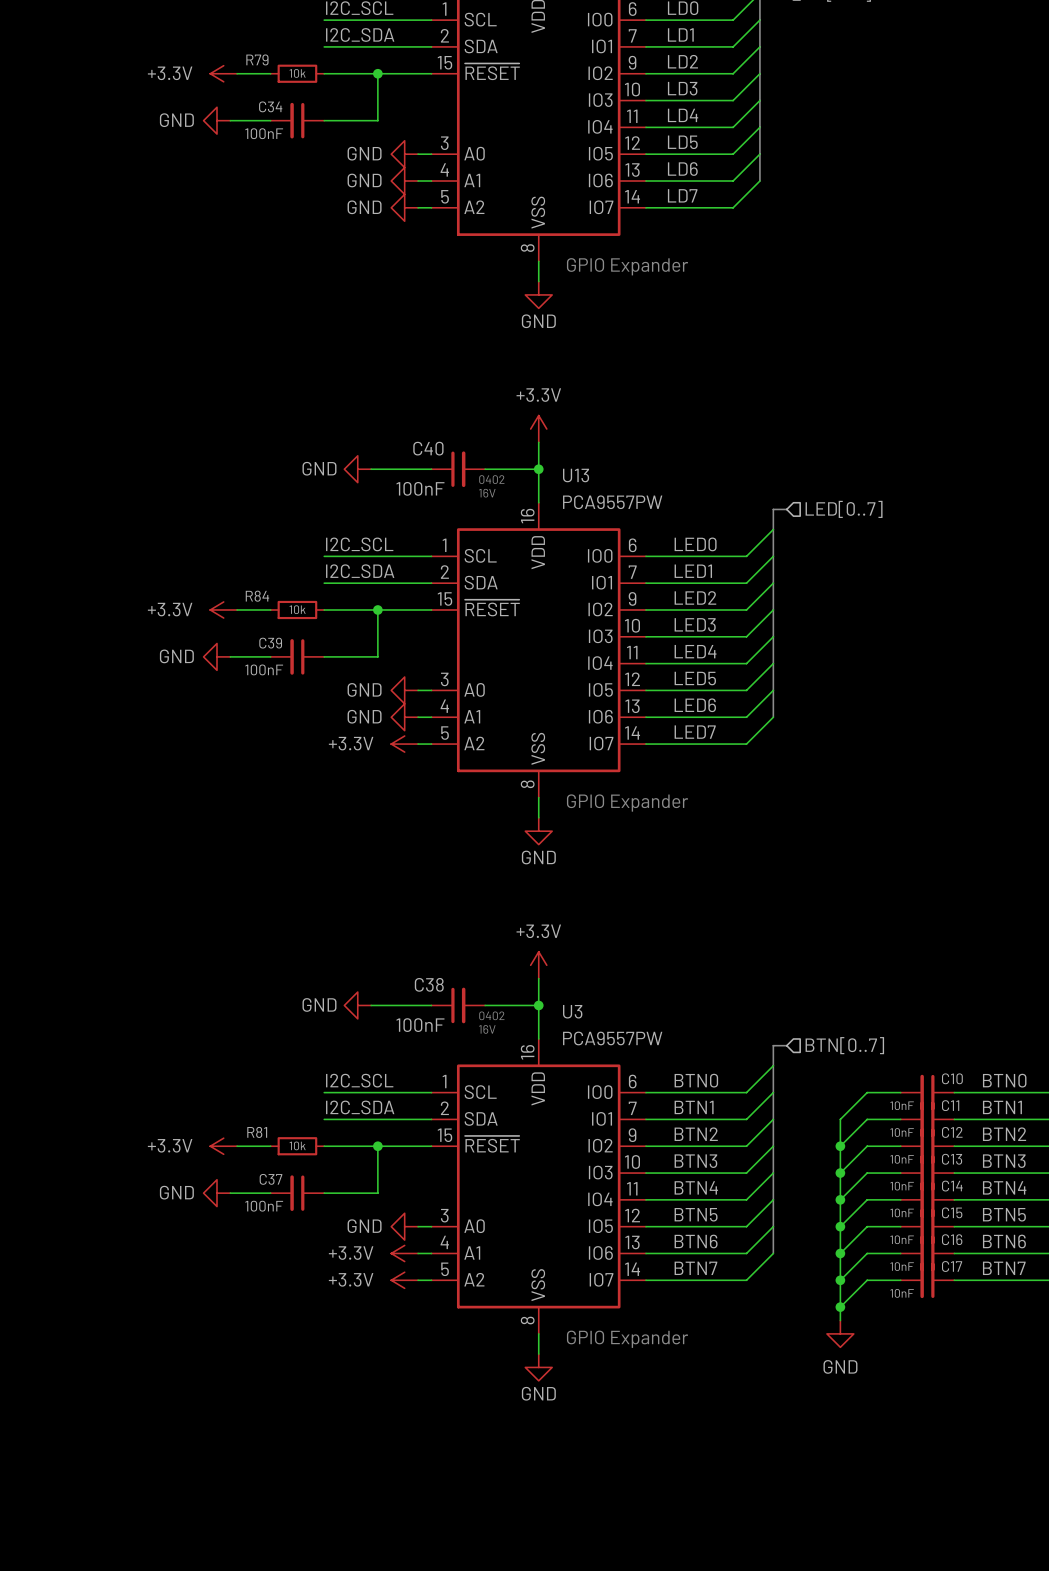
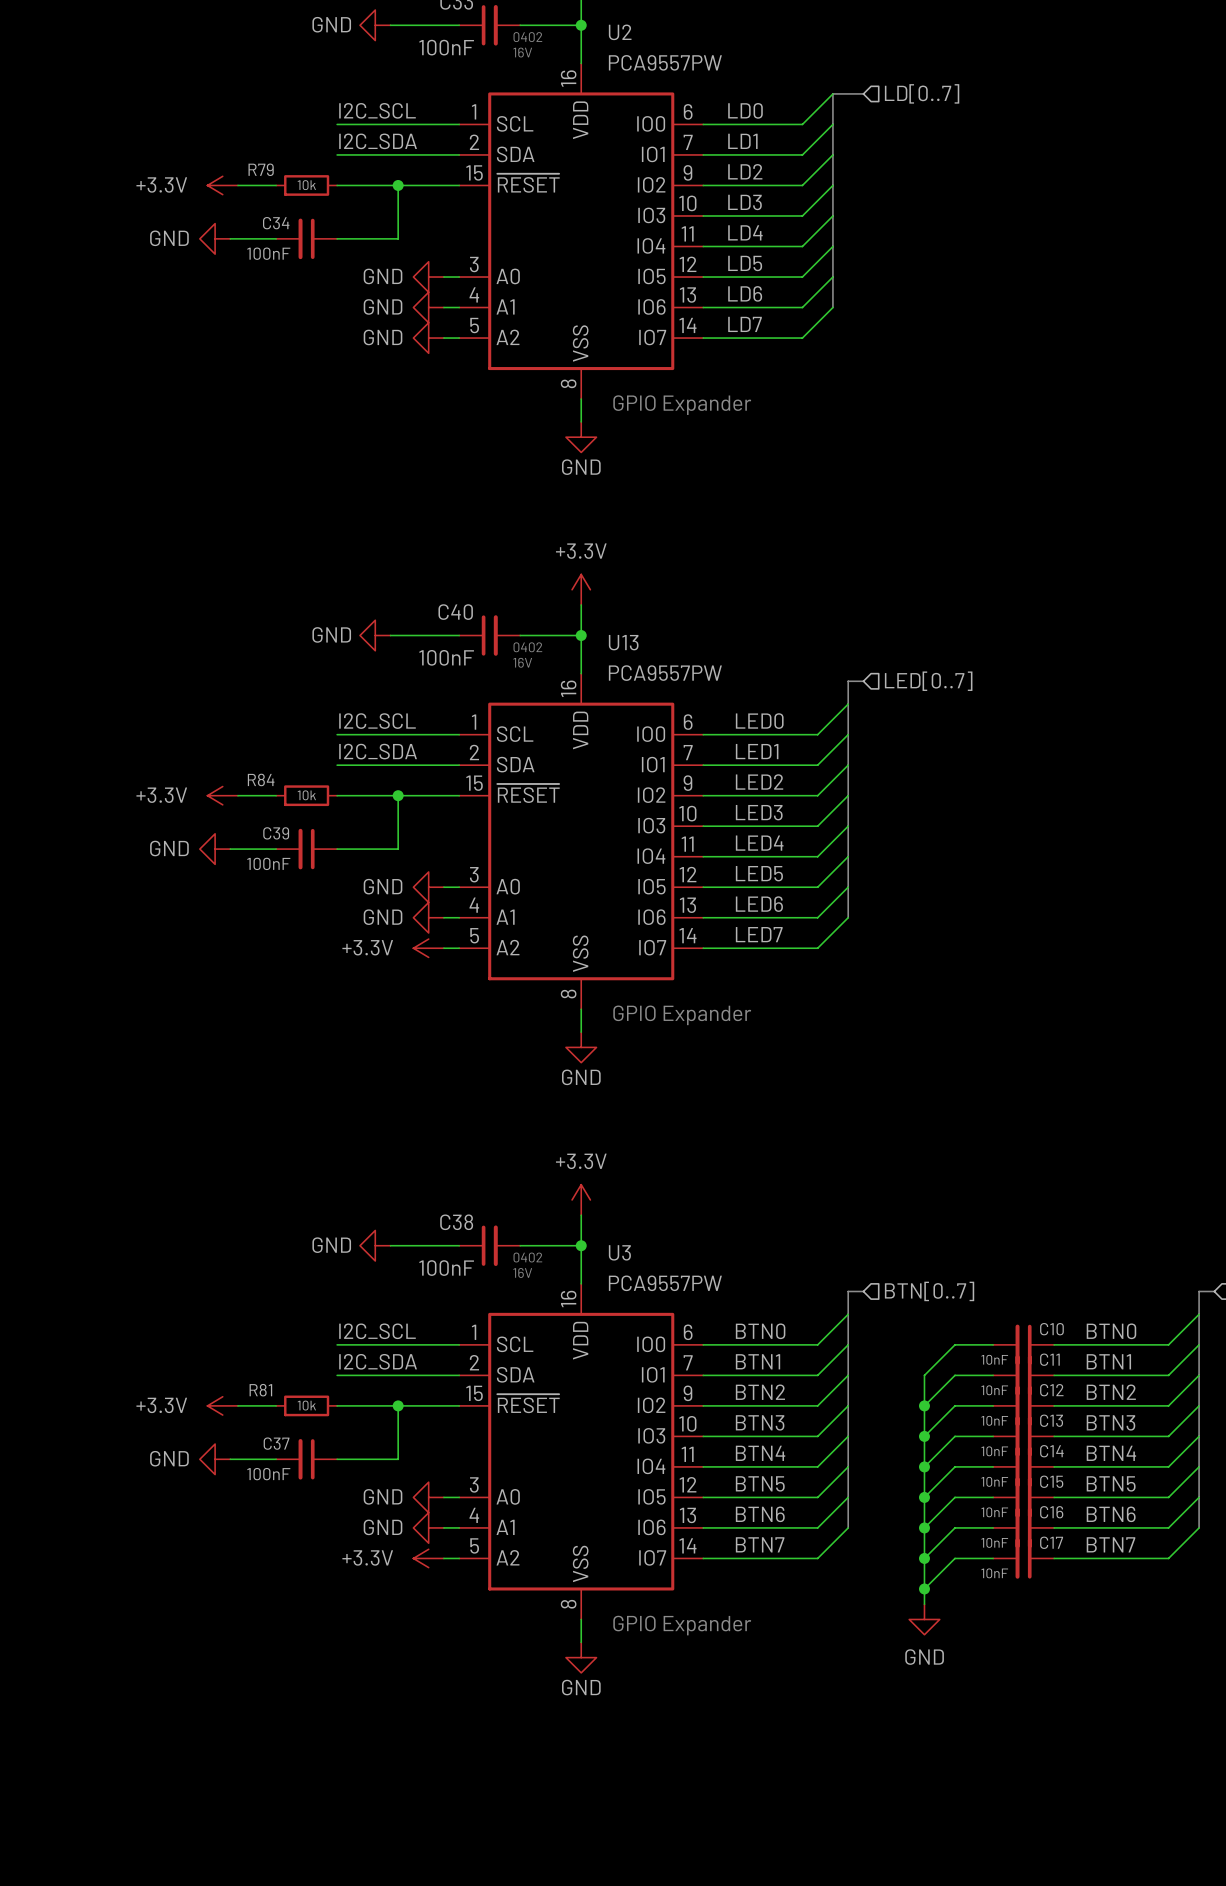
power symbol: +3.3V (404, 1253) -> GND (428, 1527)

